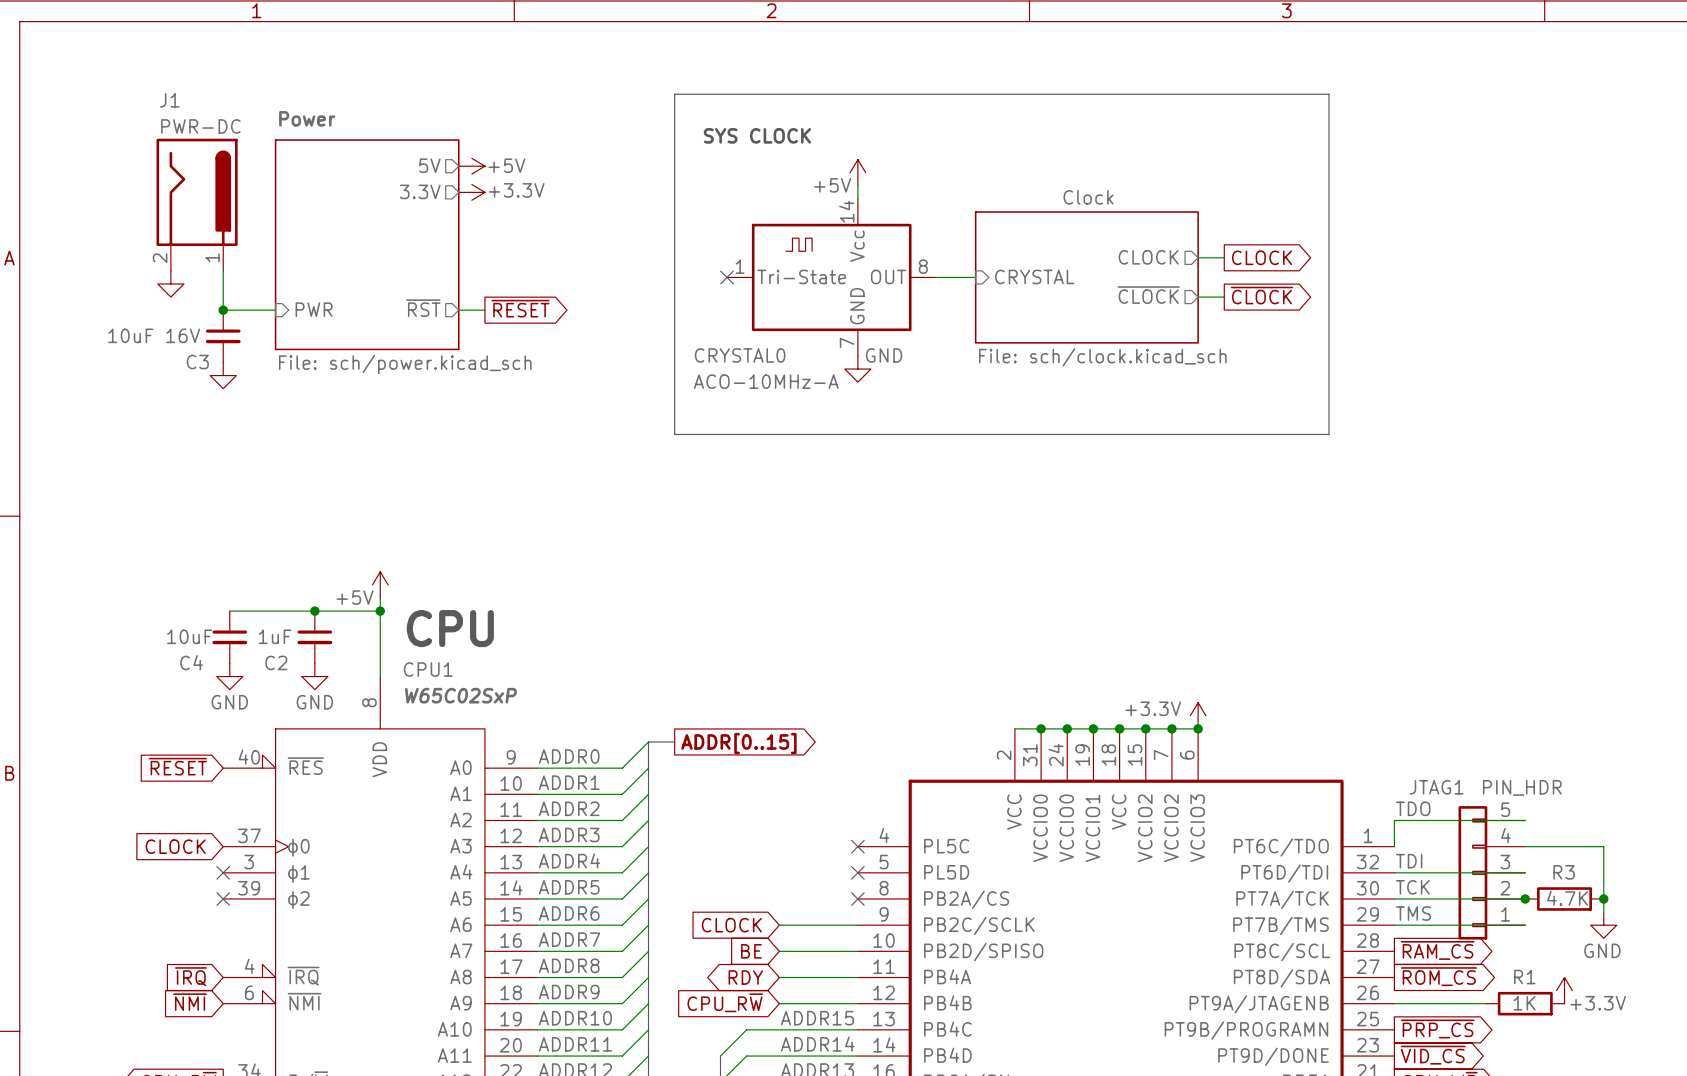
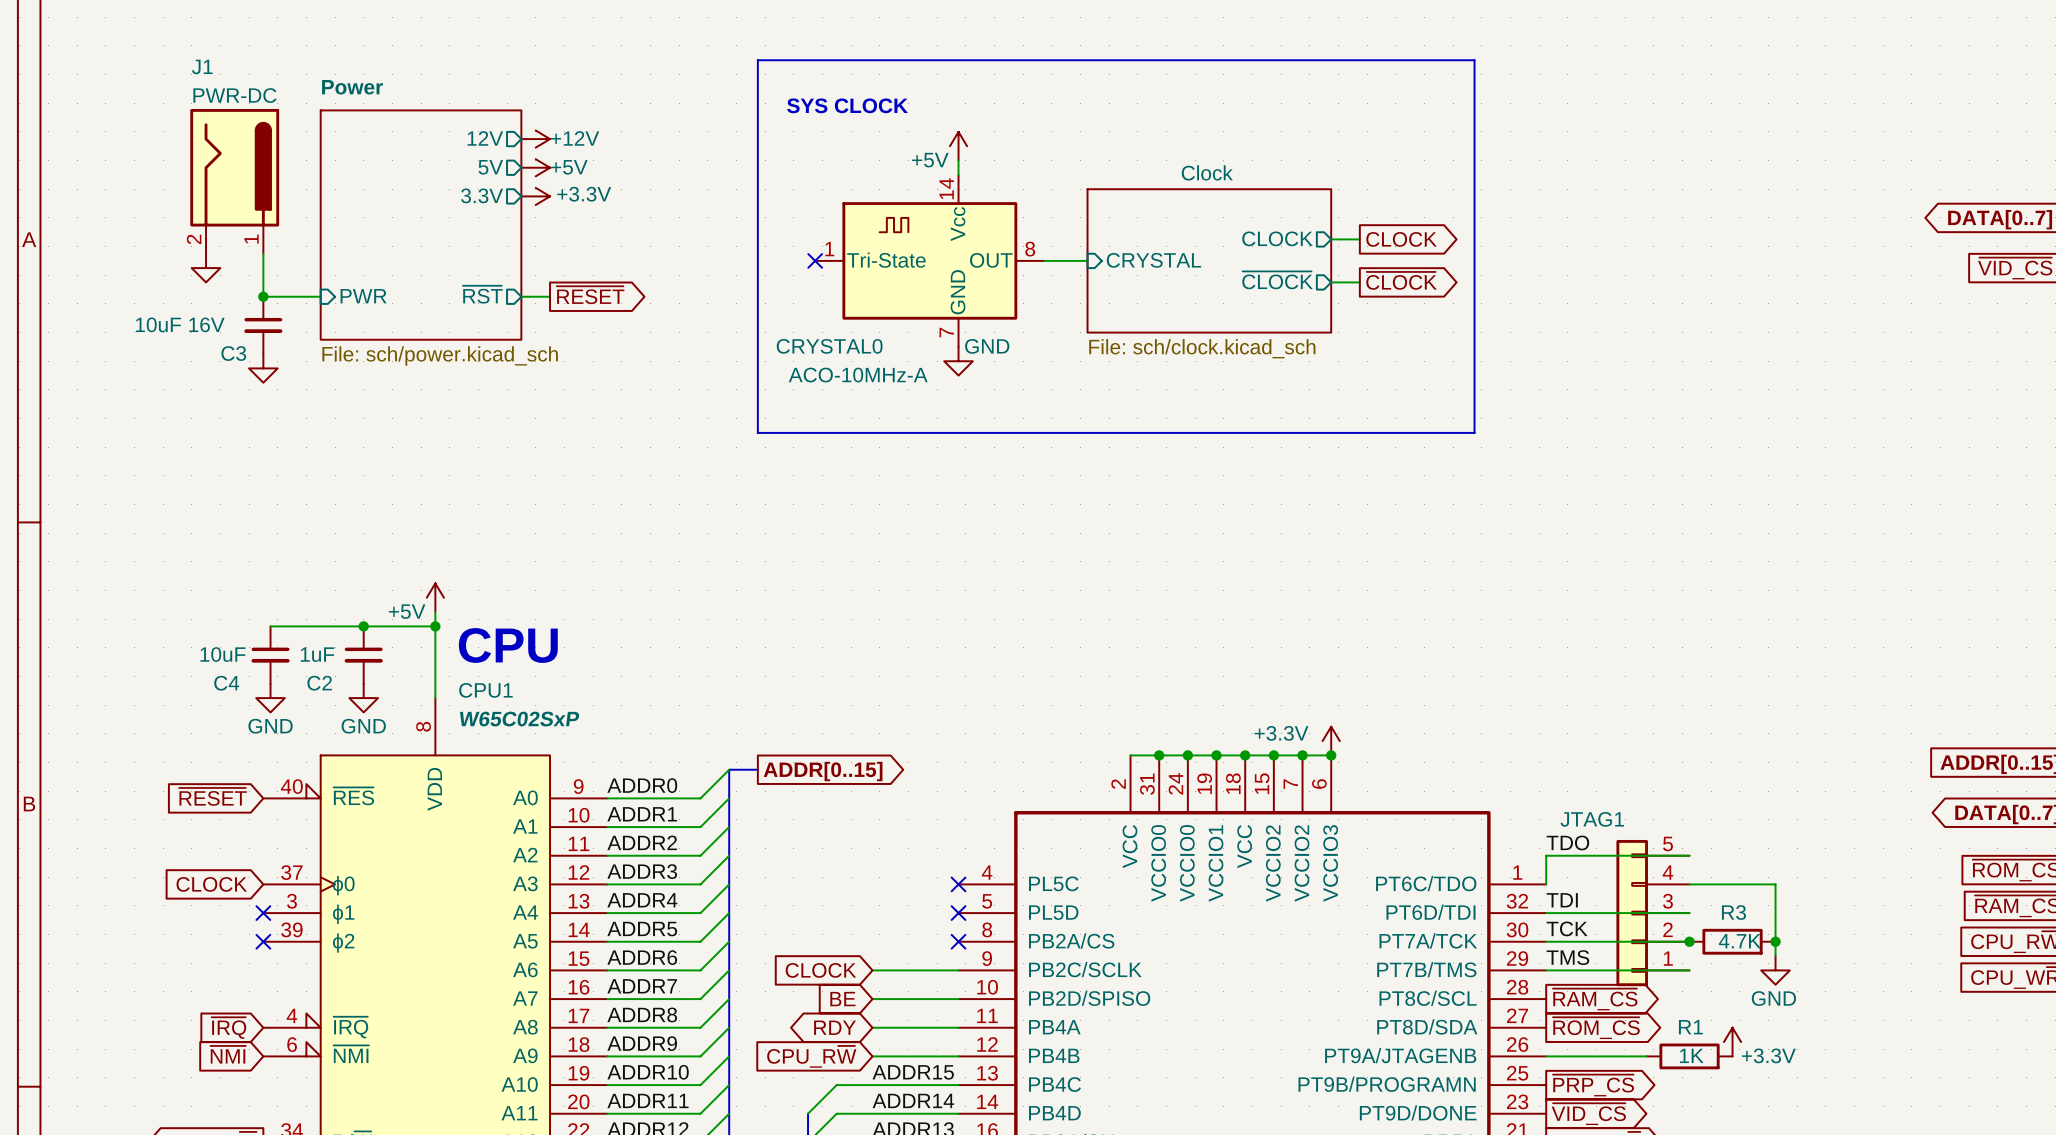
sheet pin: 5V (429, 165) -> 12V (485, 138)
power symbol: +5V (471, 166) -> +12V (535, 139)
sheet pin: 3.3V (420, 191) -> 5V (490, 167)
power symbol: +3.3V (471, 192) -> +5V (535, 167)
sheet pin: none -> 3.3V (482, 195)
power symbol: none -> +3.3V (535, 196)
JTAG1 value: PIN_HDR (1522, 787) -> none

